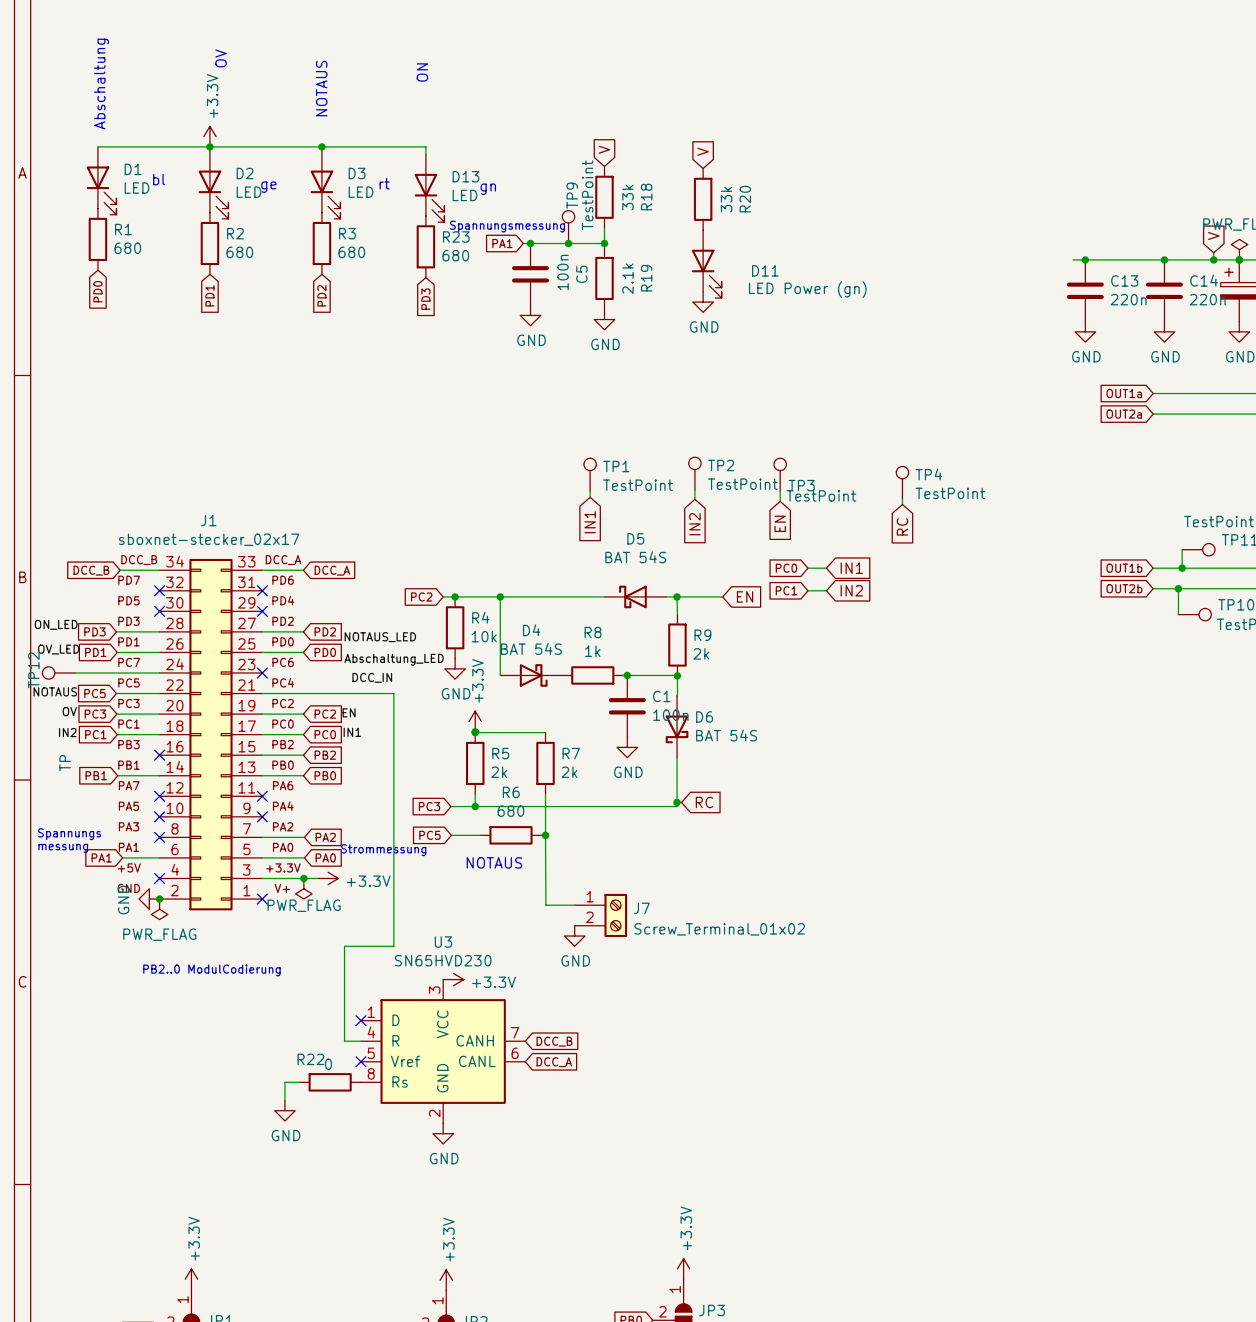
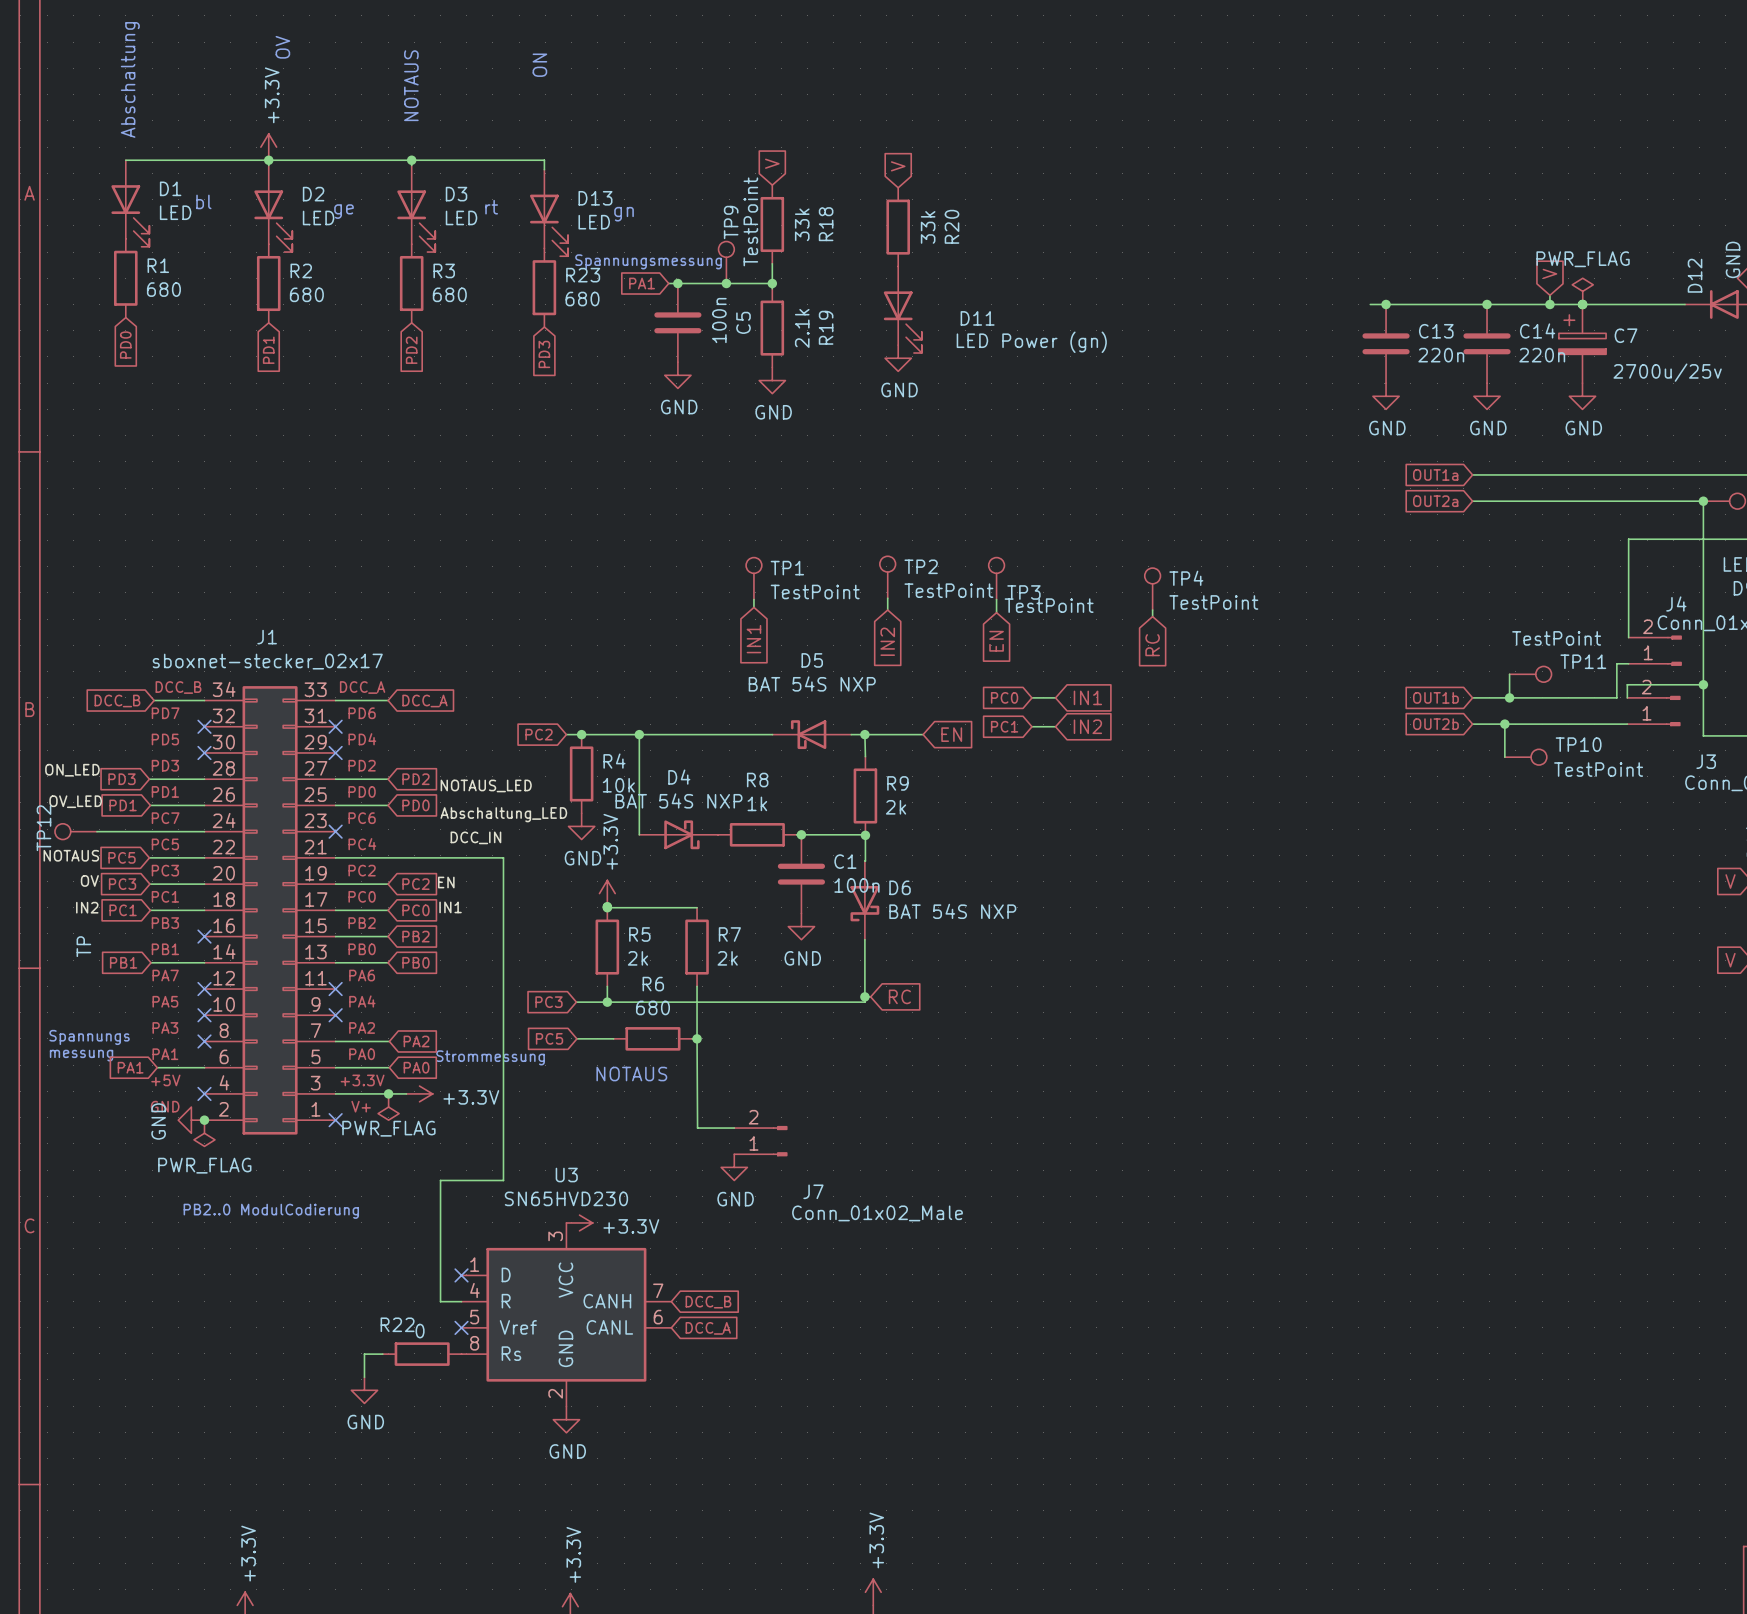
D5 value: BAT 54S (635, 557) -> BAT 54S NXP (812, 683)
D4 value: BAT 54S (531, 648) -> BAT 54S NXP (678, 800)
D6 value: BAT 54S (726, 735) -> BAT 54S NXP (952, 911)
J7 symbol: [574, 893, 628, 938] -> [734, 1125, 788, 1157]
J7 name position: J7 (641, 908) -> J7 (813, 1191)
J7 value: Screw_Terminal_01x02 (719, 929) -> Conn_01x02_Male (877, 1213)

